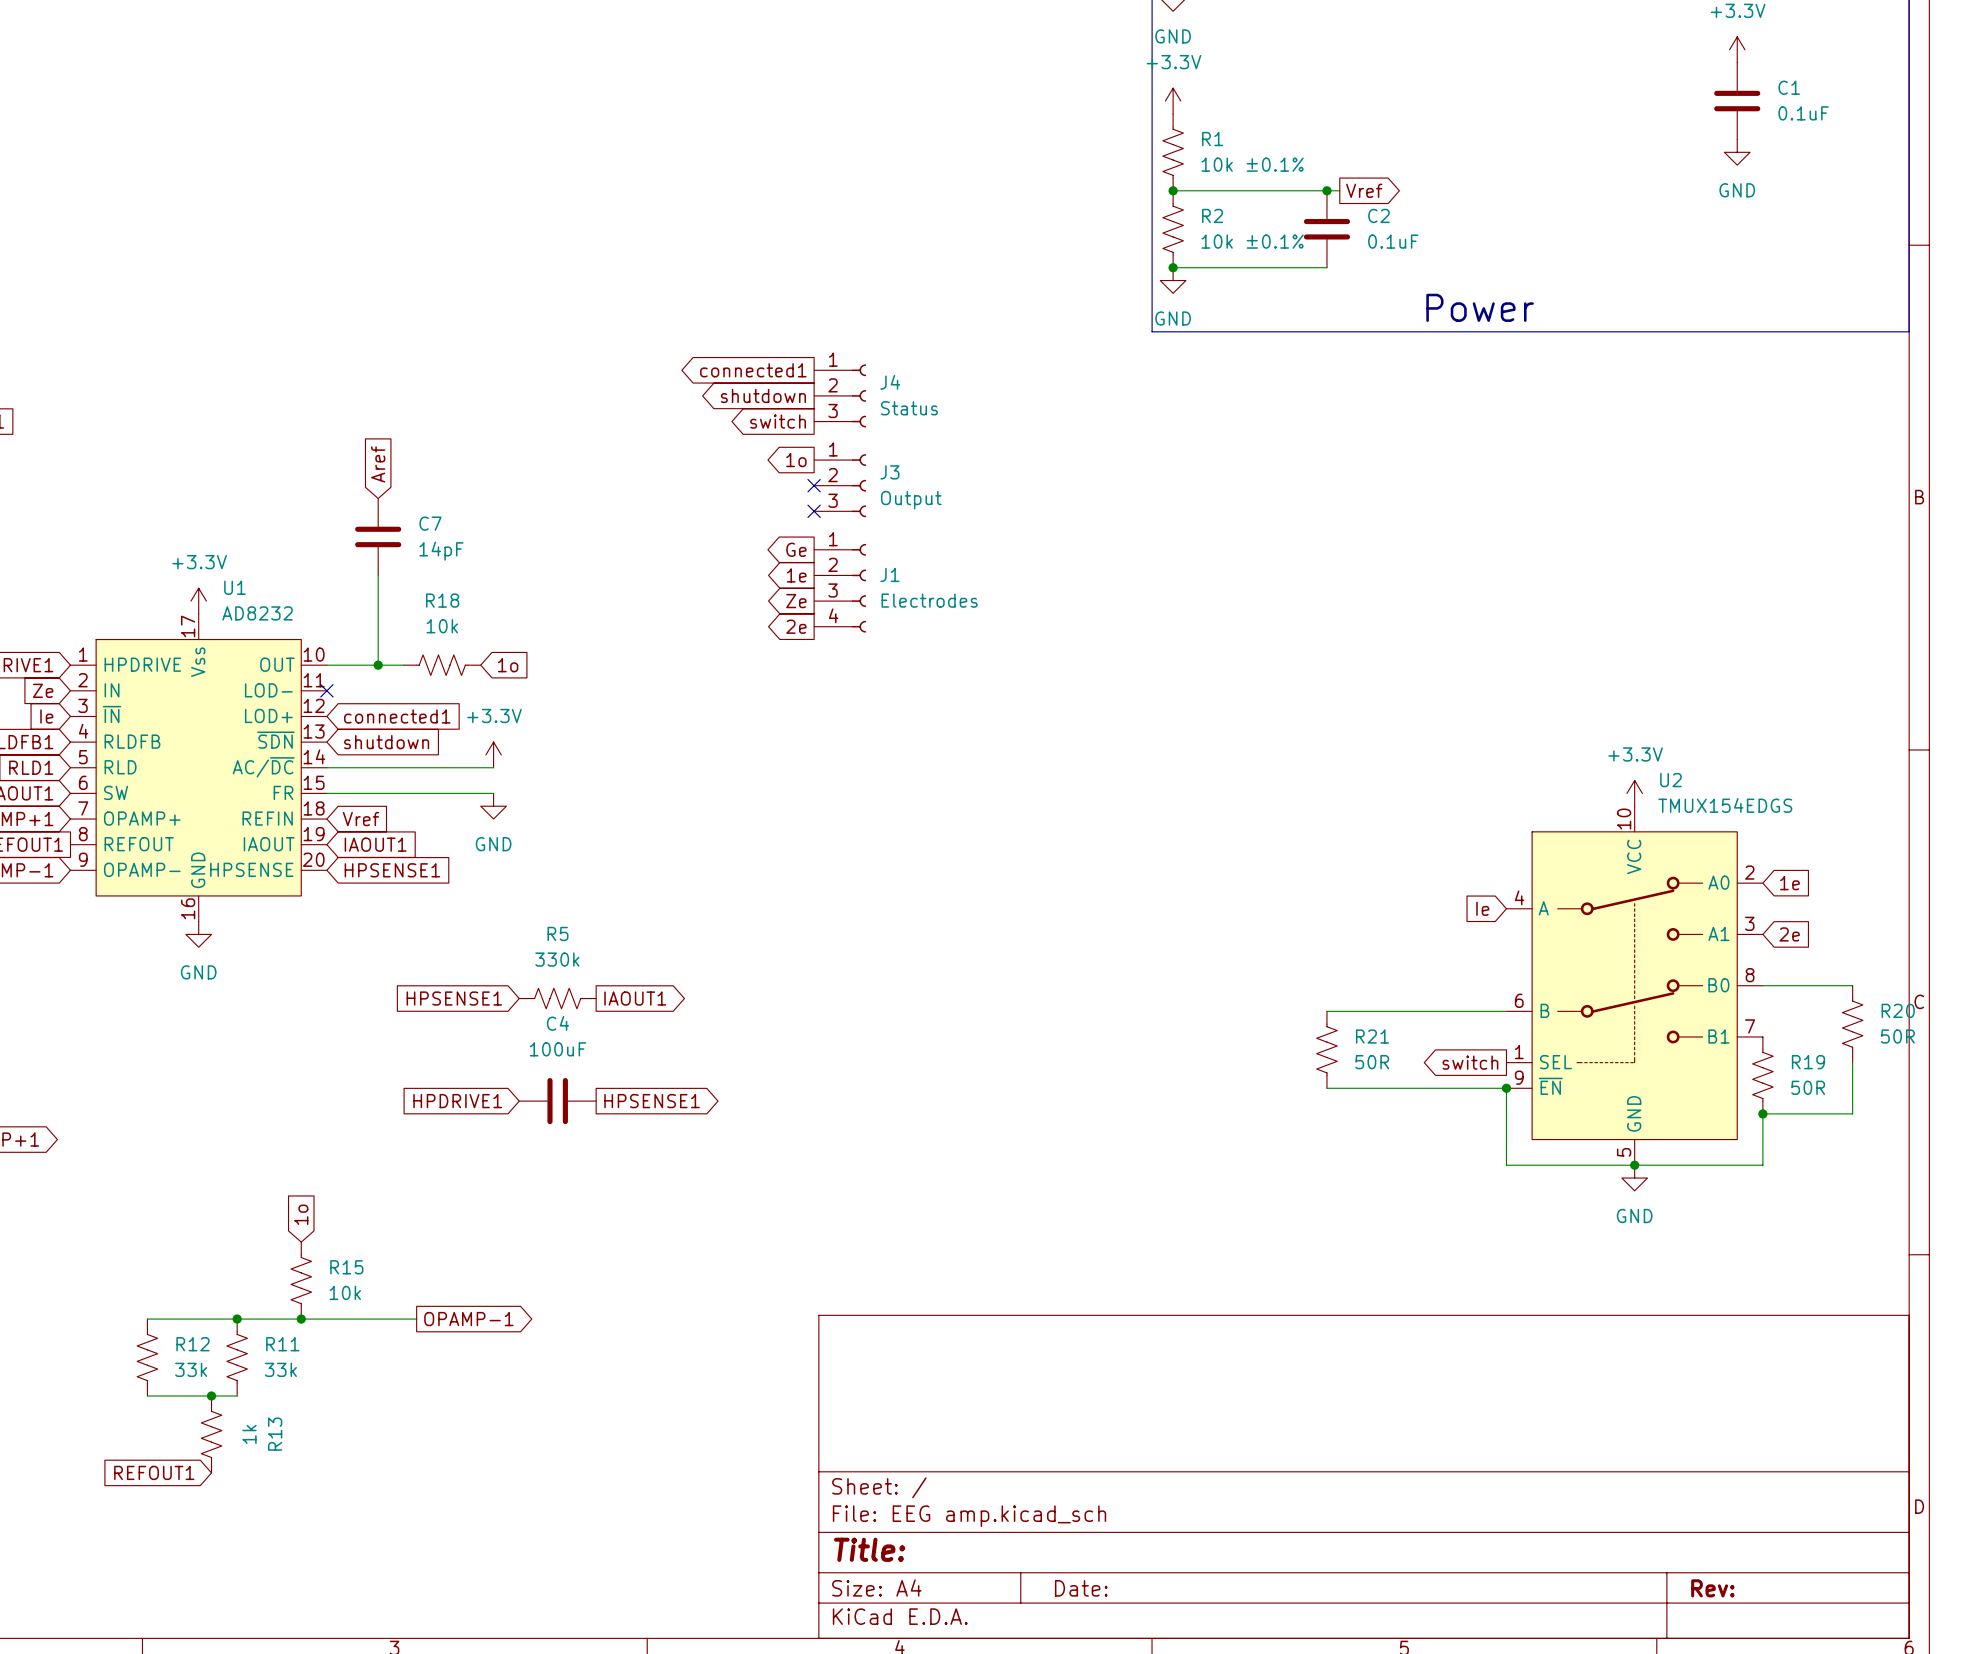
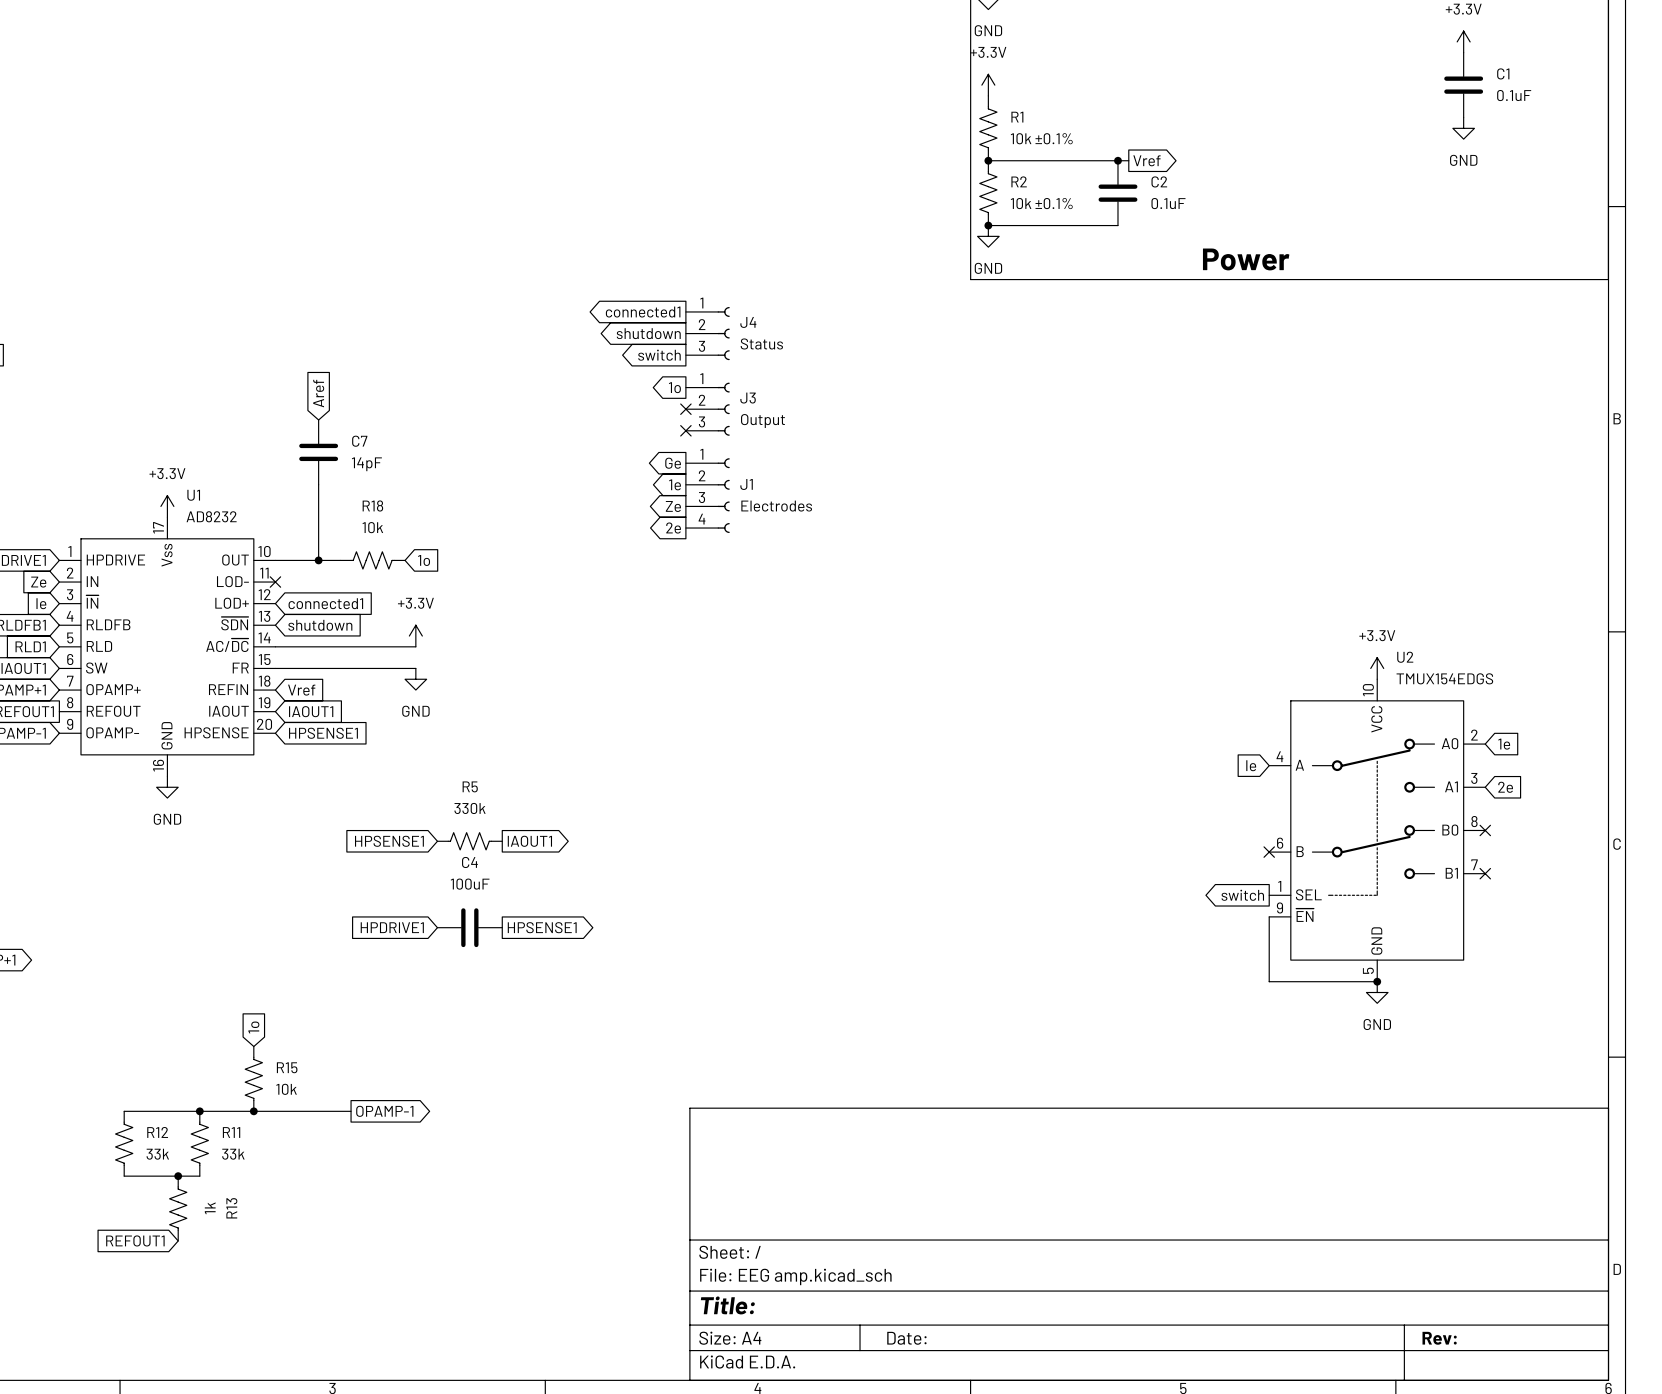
wire: (1762, 985) (1852, 985) -> none
no-connect mark: none -> (1485, 830)
wire: (1326, 1011) (1506, 1011) -> none
no-connect mark: none -> (1269, 852)
R20: 50R (1852, 1024) -> none
no-connect mark: none -> (1485, 873)
R21: 50R (1326, 1049) -> none
wire: (1852, 1062) (1852, 1113) (1762, 1113) (1762, 1165) (1634, 1165) -> none
R19: 50R (1762, 1075) -> none
wire: (1326, 1088) (1506, 1088) -> none
junction: (1506, 1088) -> none
junction: (1762, 1113) -> none

